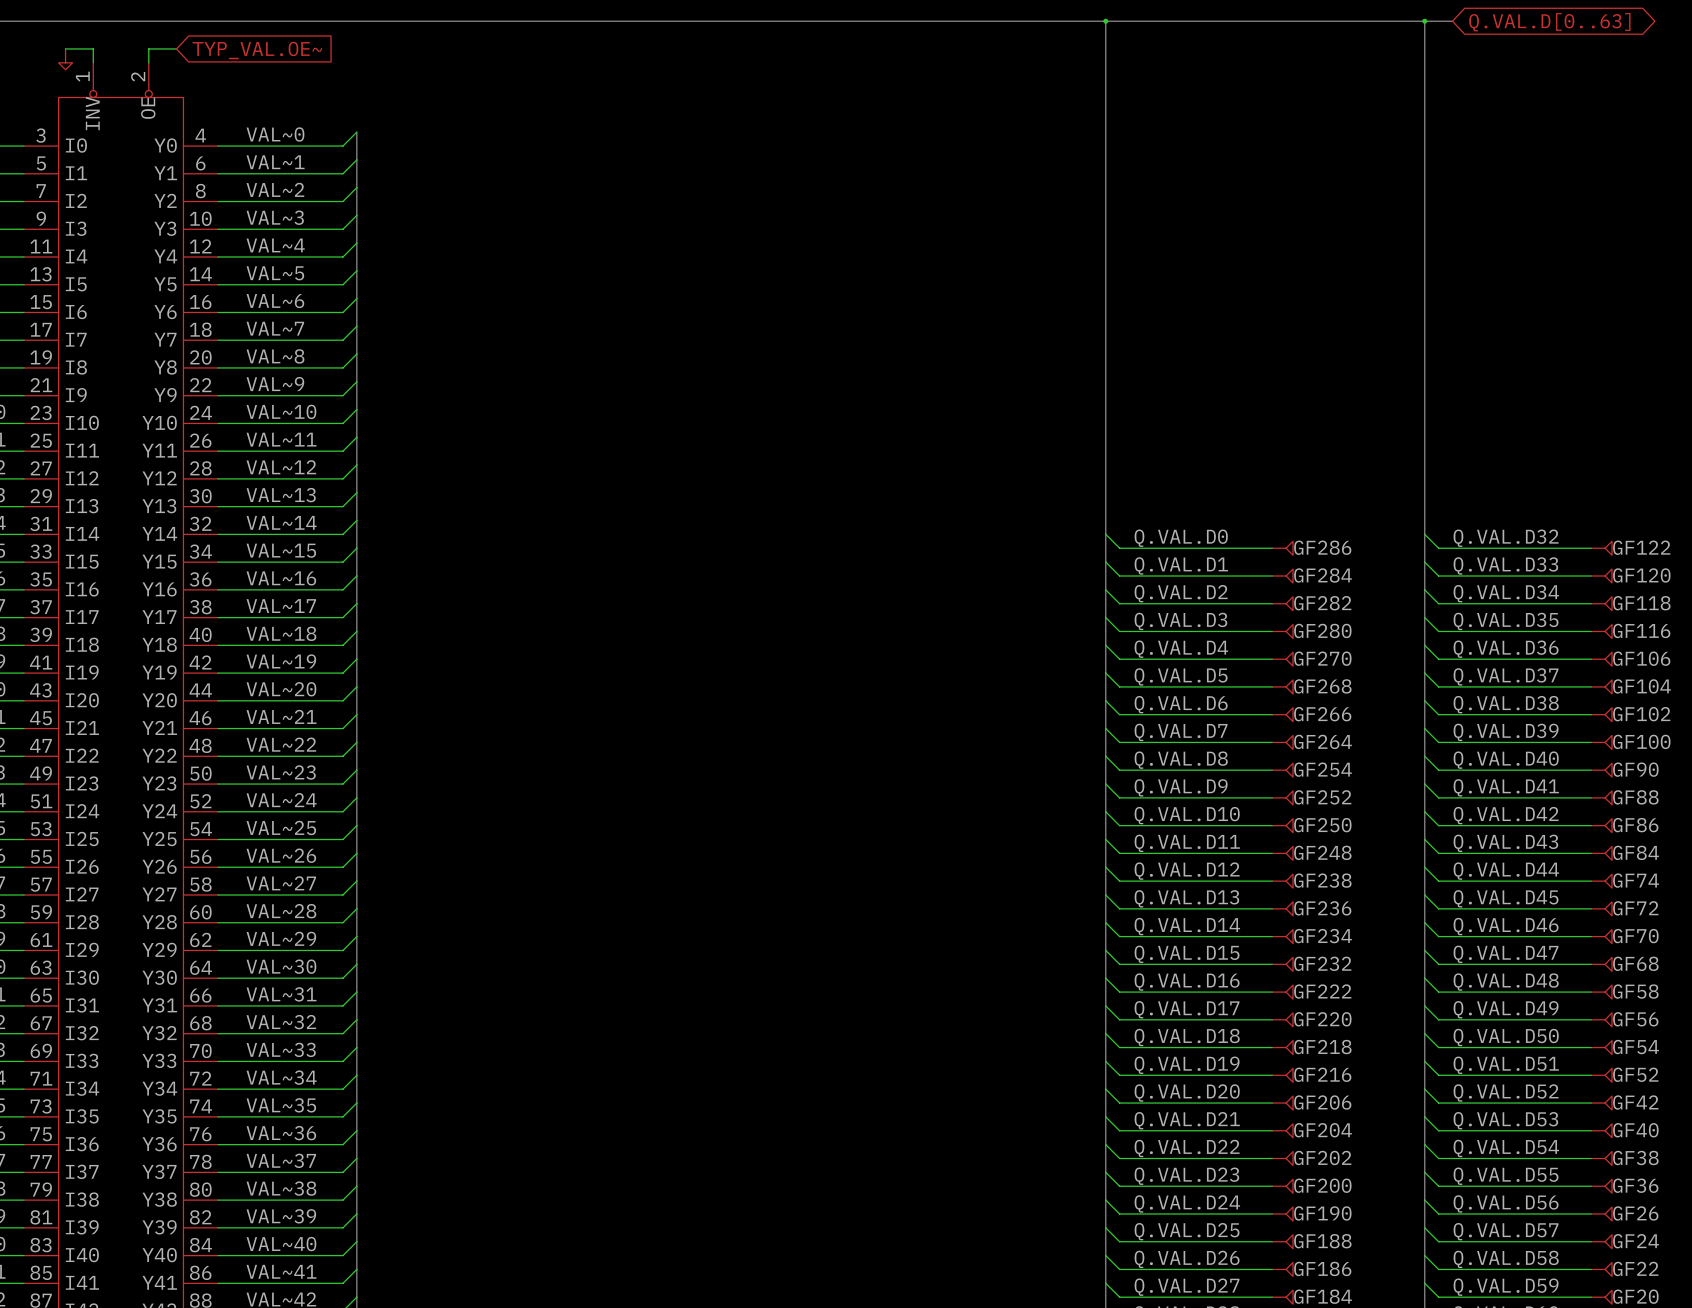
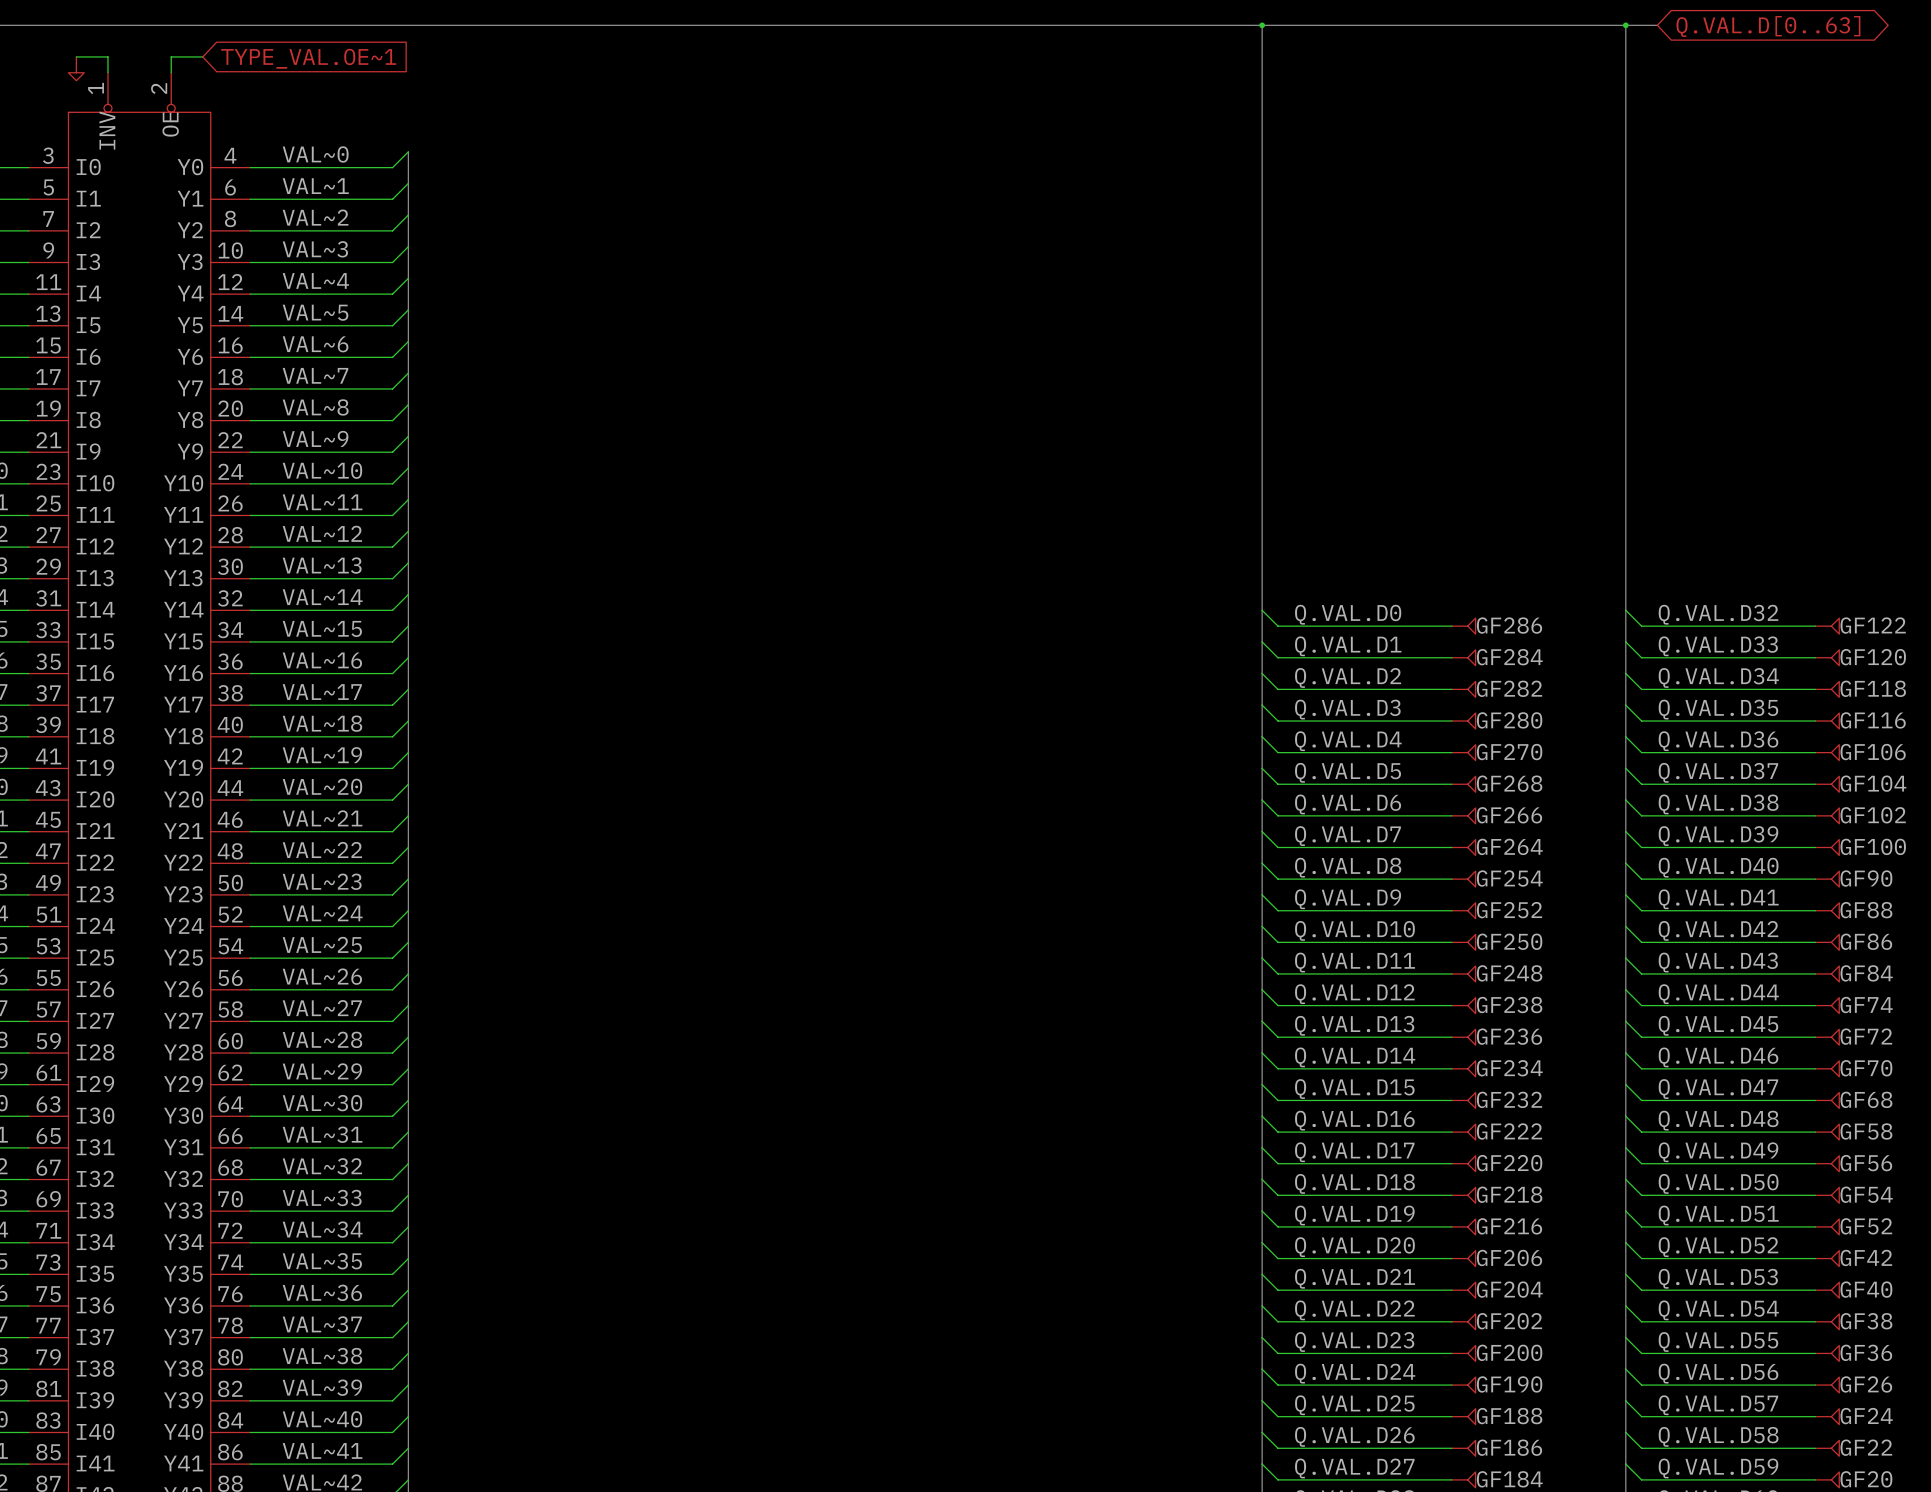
global label: TYP_VAL.OE~ (257, 50) -> TYPE_VAL.OE~1 (308, 58)

